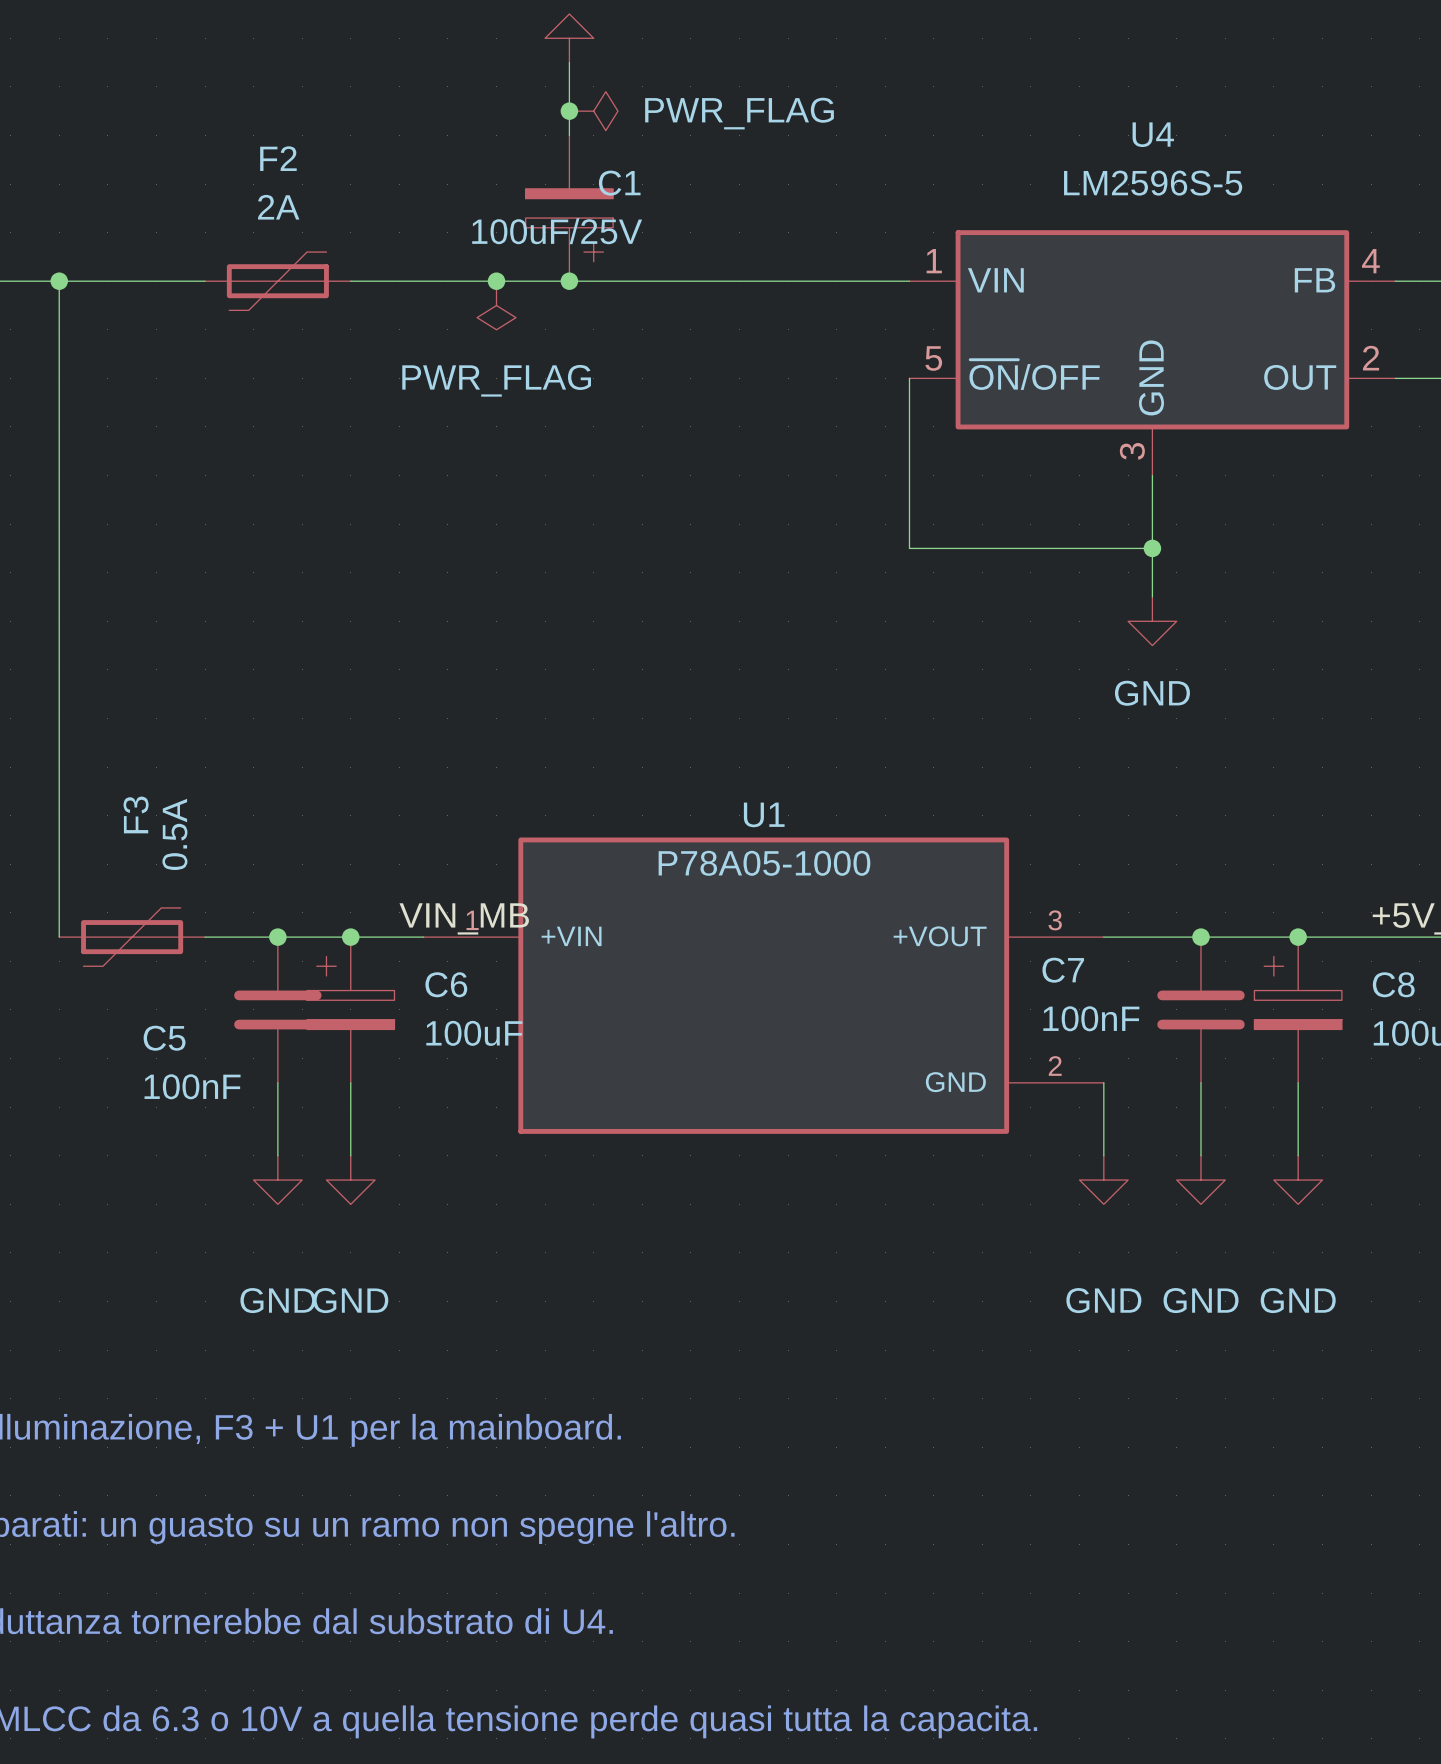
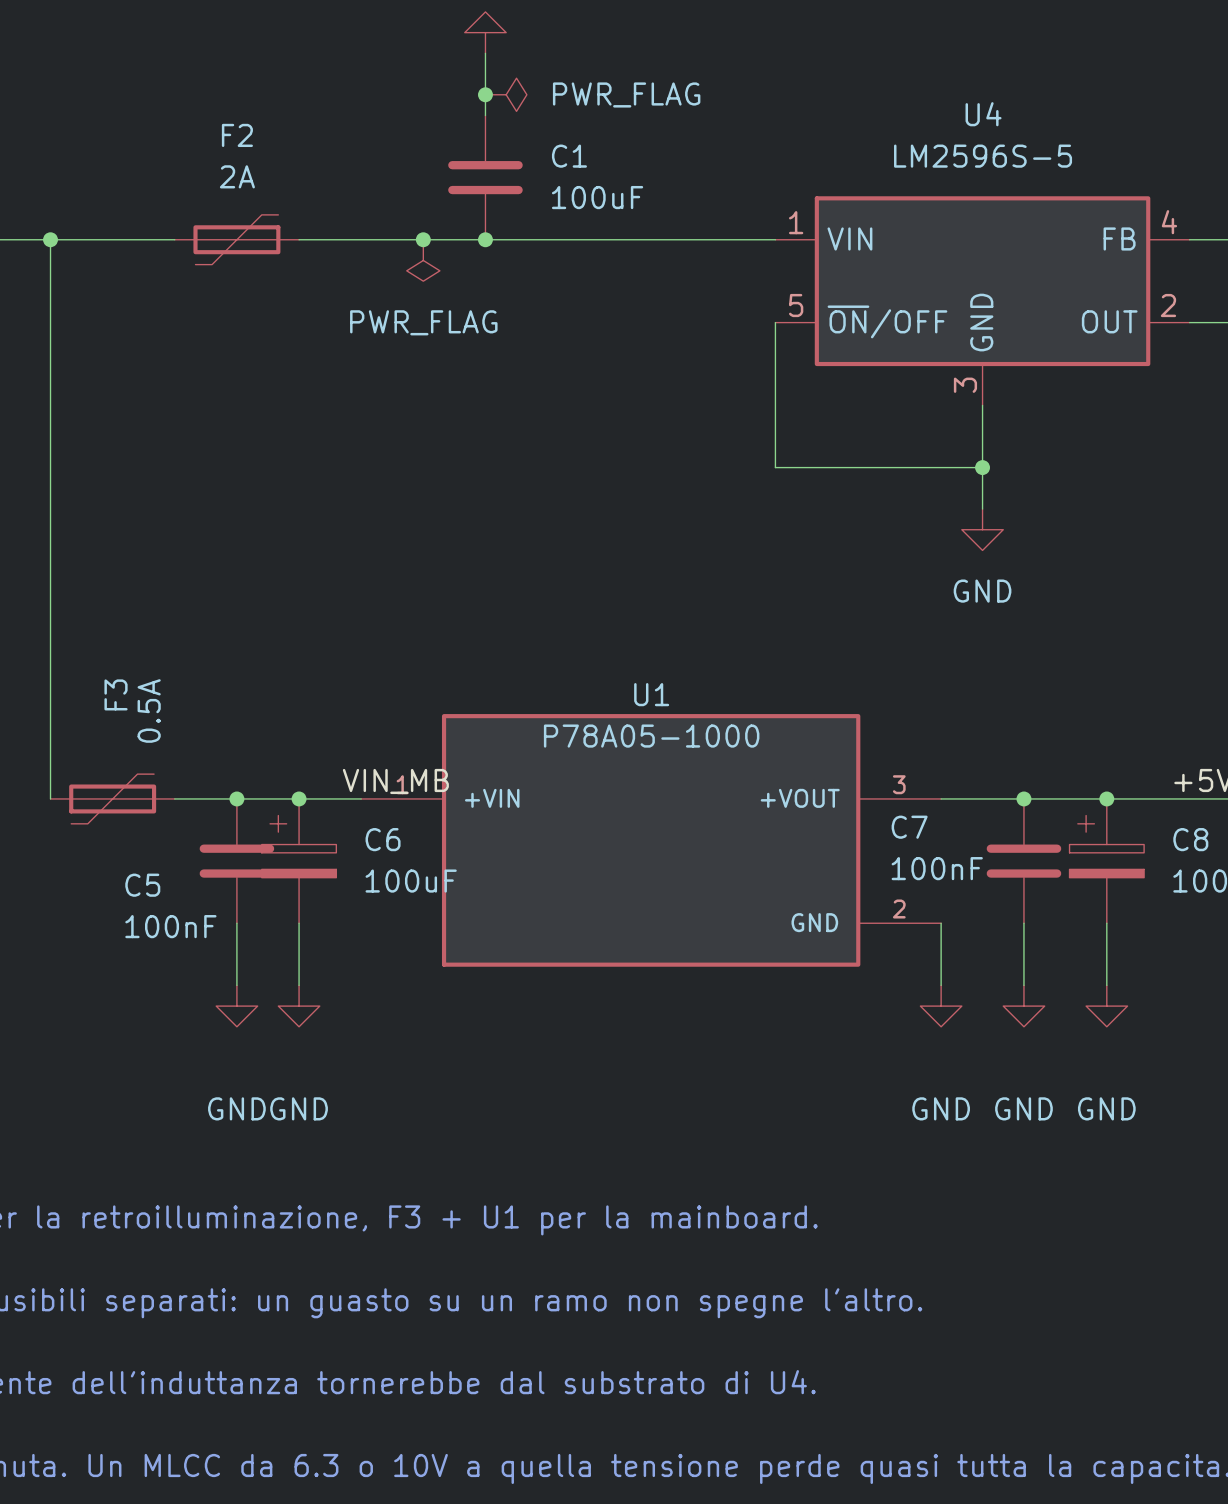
C1 symbol: [525, 135, 614, 282] -> [448, 115, 523, 240]
C1 name position: C1 (619, 183) -> C1 (569, 156)
C1 value: 100uF/25V (557, 231) -> 100uF (597, 197)

